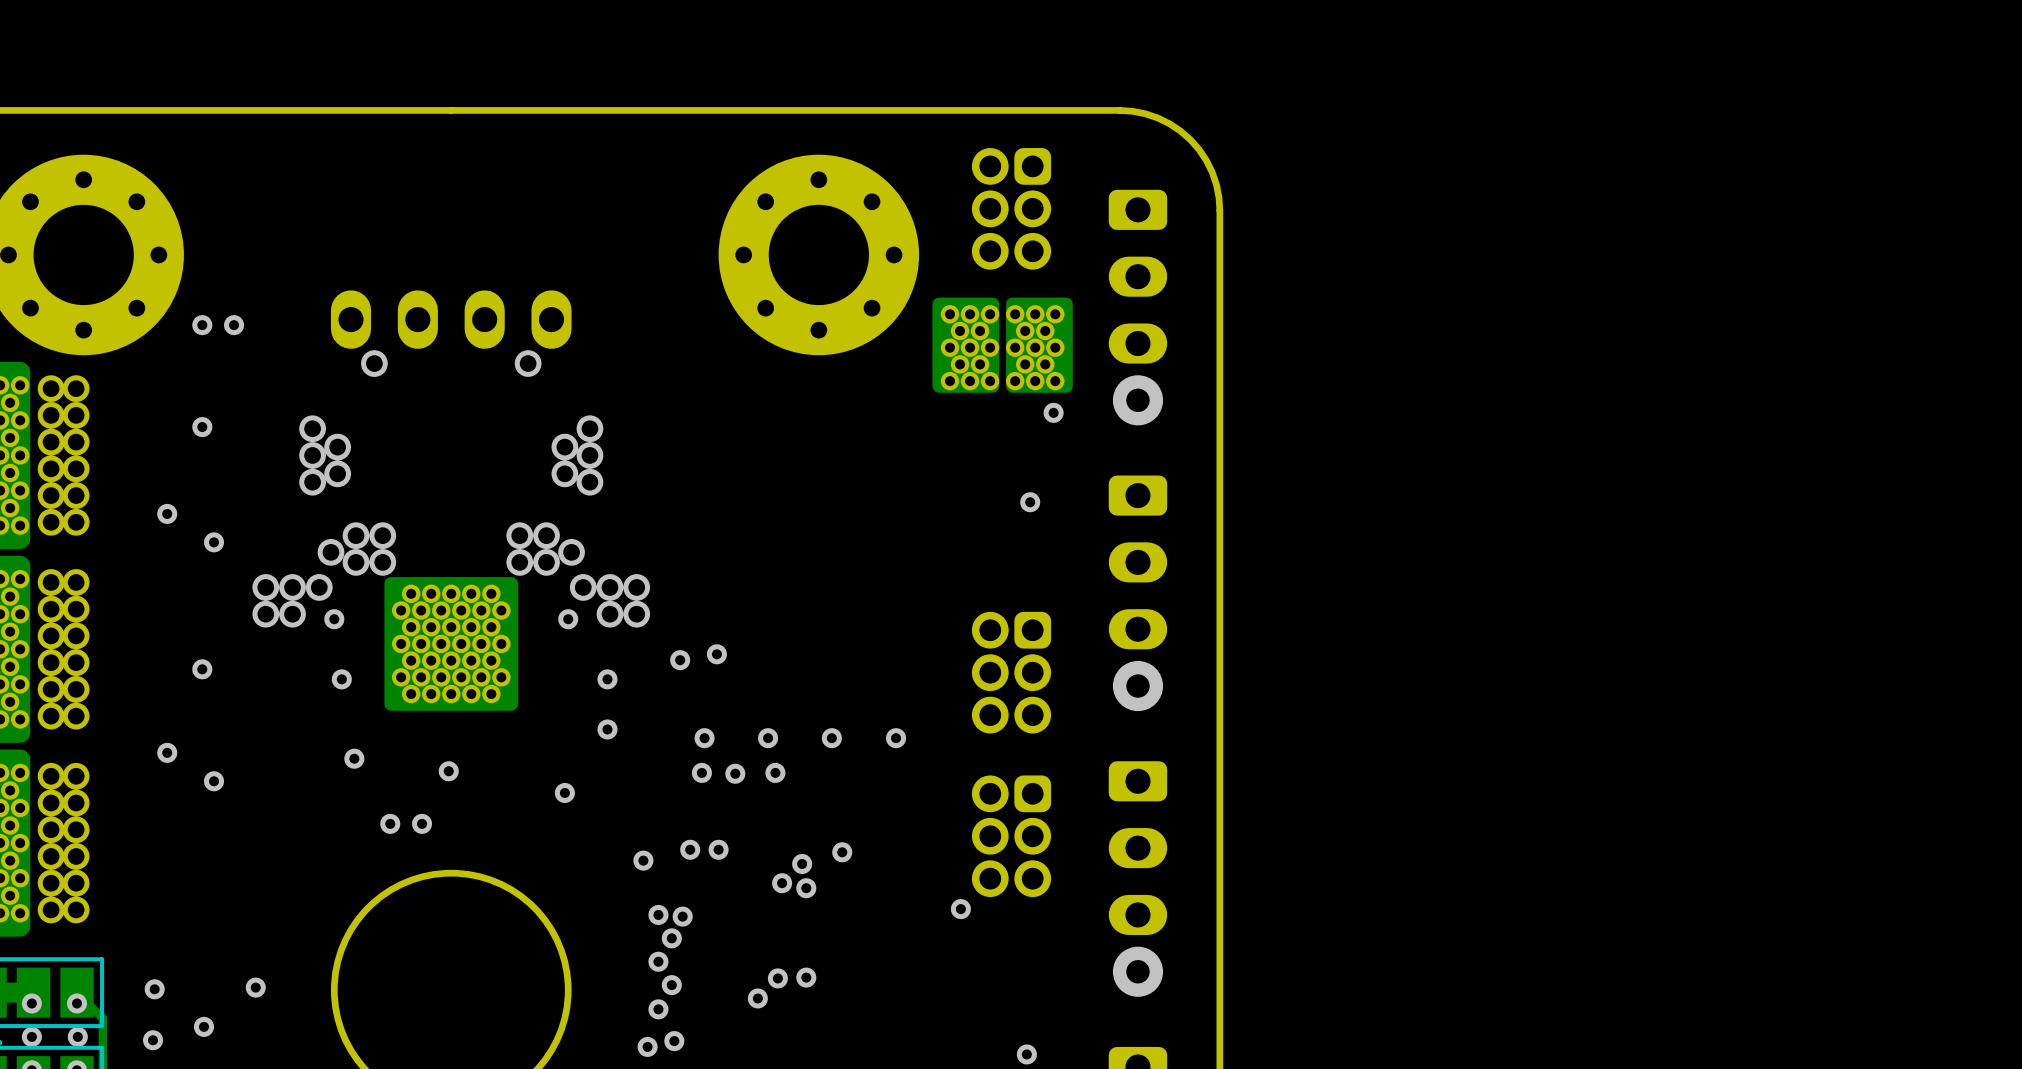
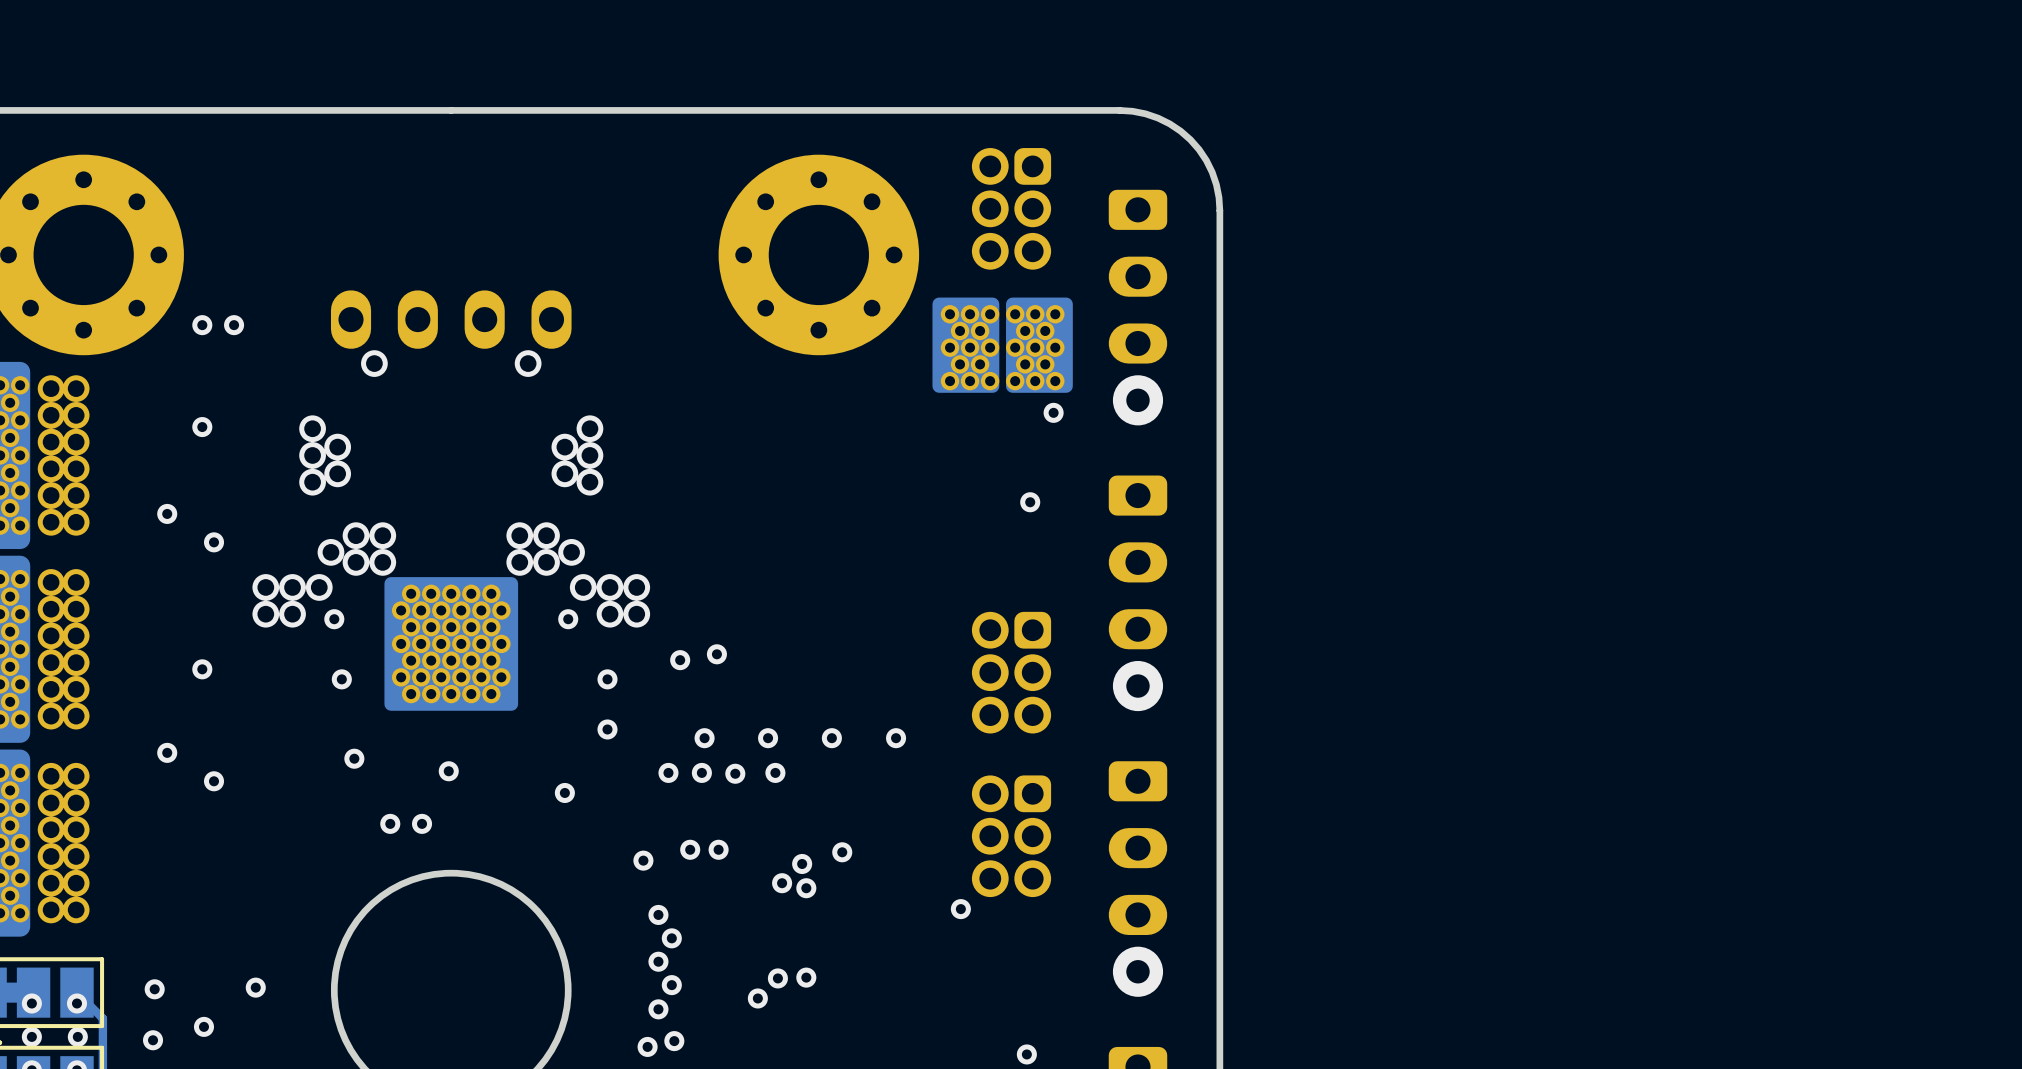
via position: (682, 916) -> (668, 772)

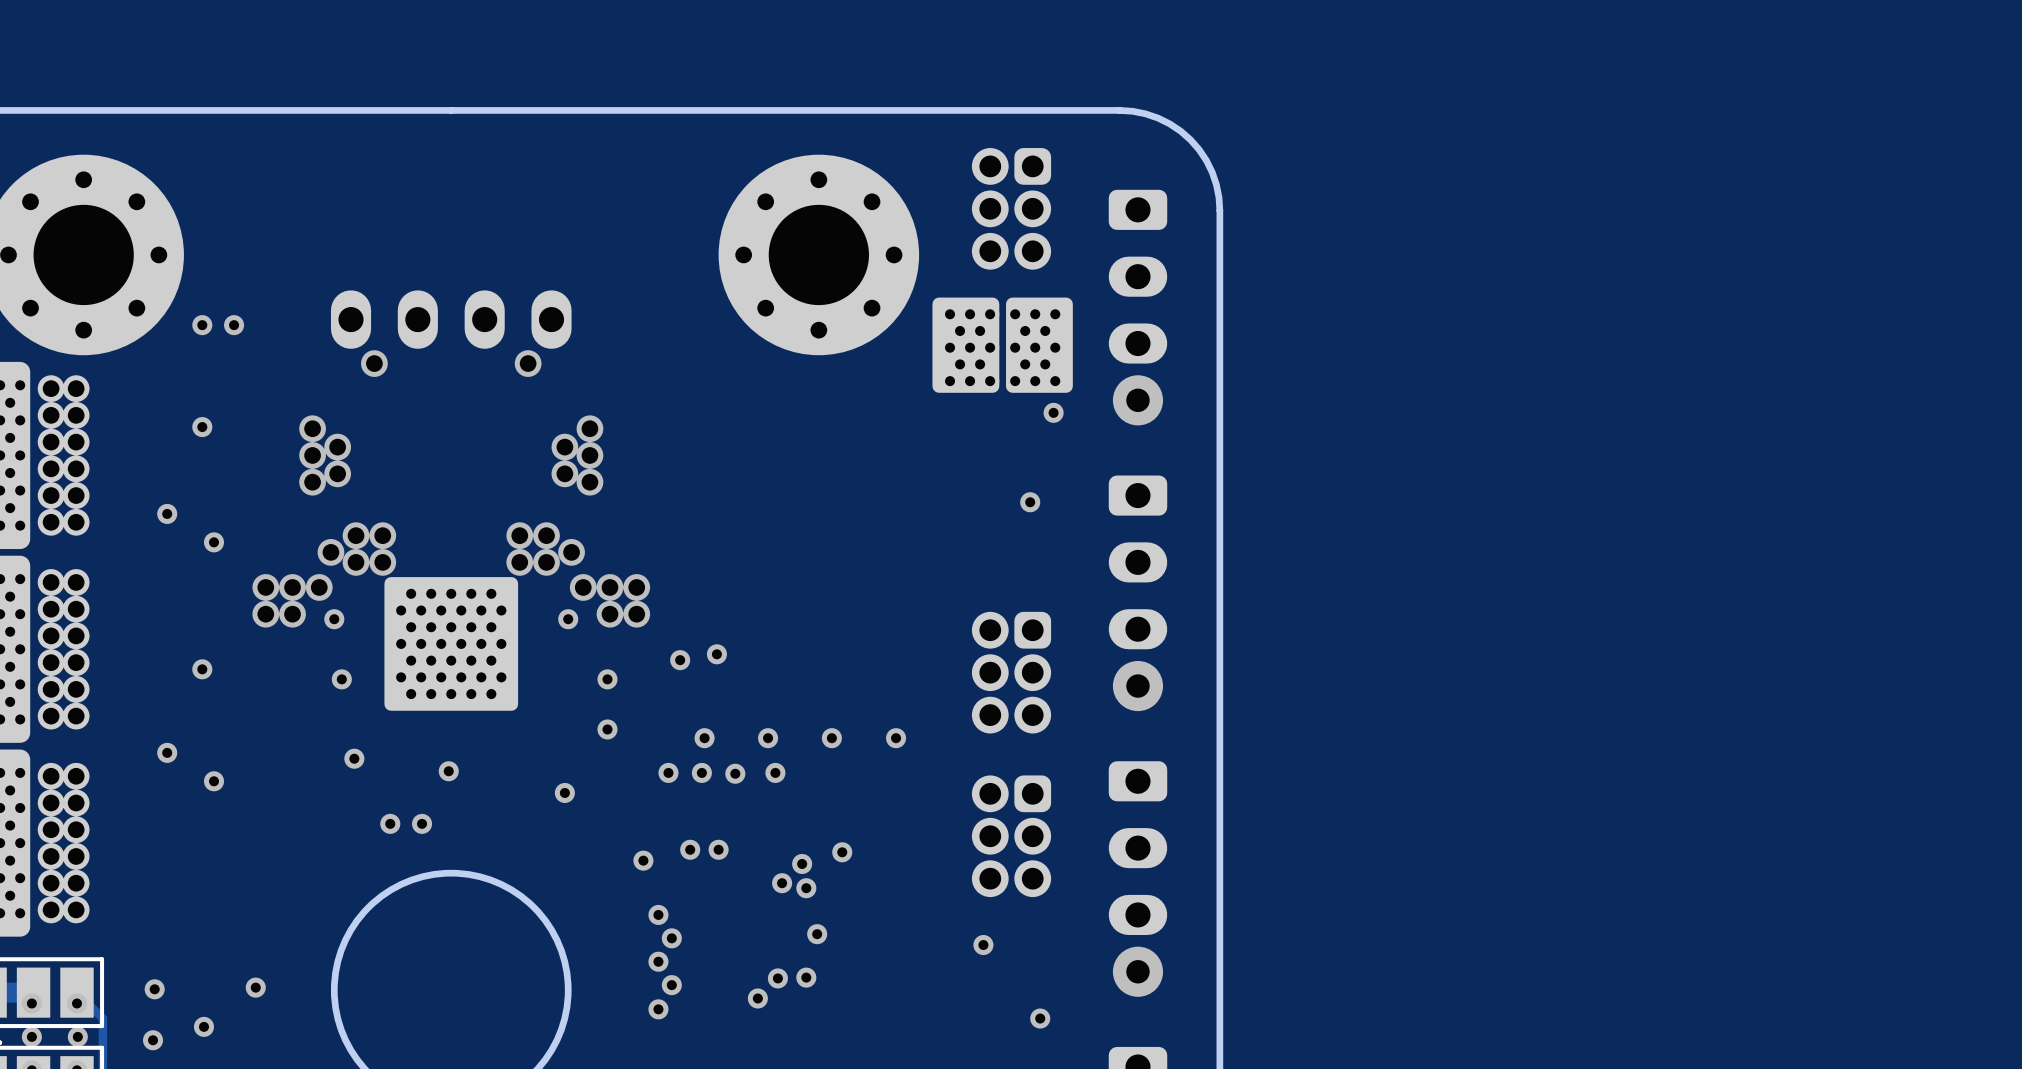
via position: (960, 909) -> (983, 945)
via: none -> (817, 934)
via: (674, 1041) -> none
via: (647, 1046) -> none
via position: (1026, 1054) -> (1040, 1018)

